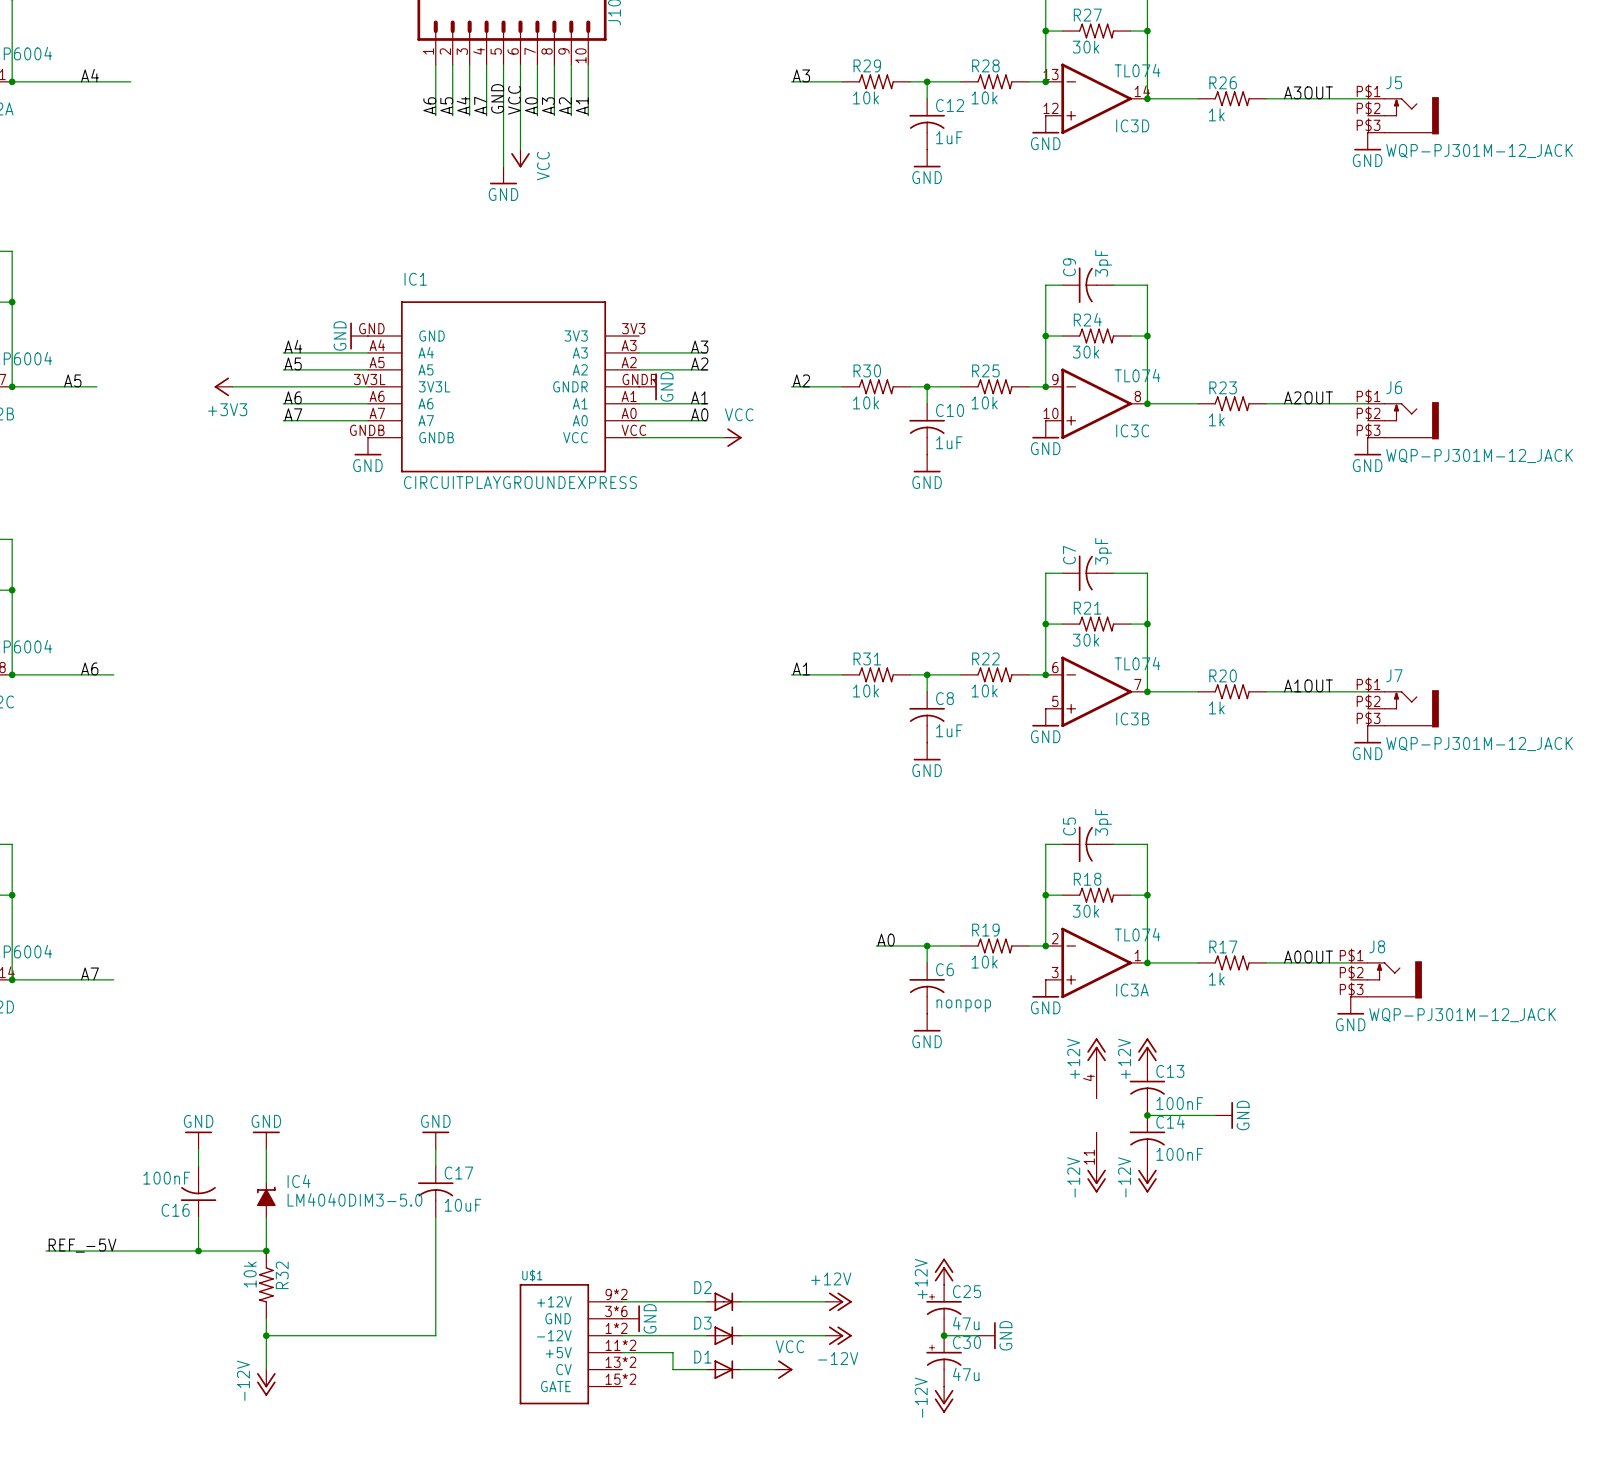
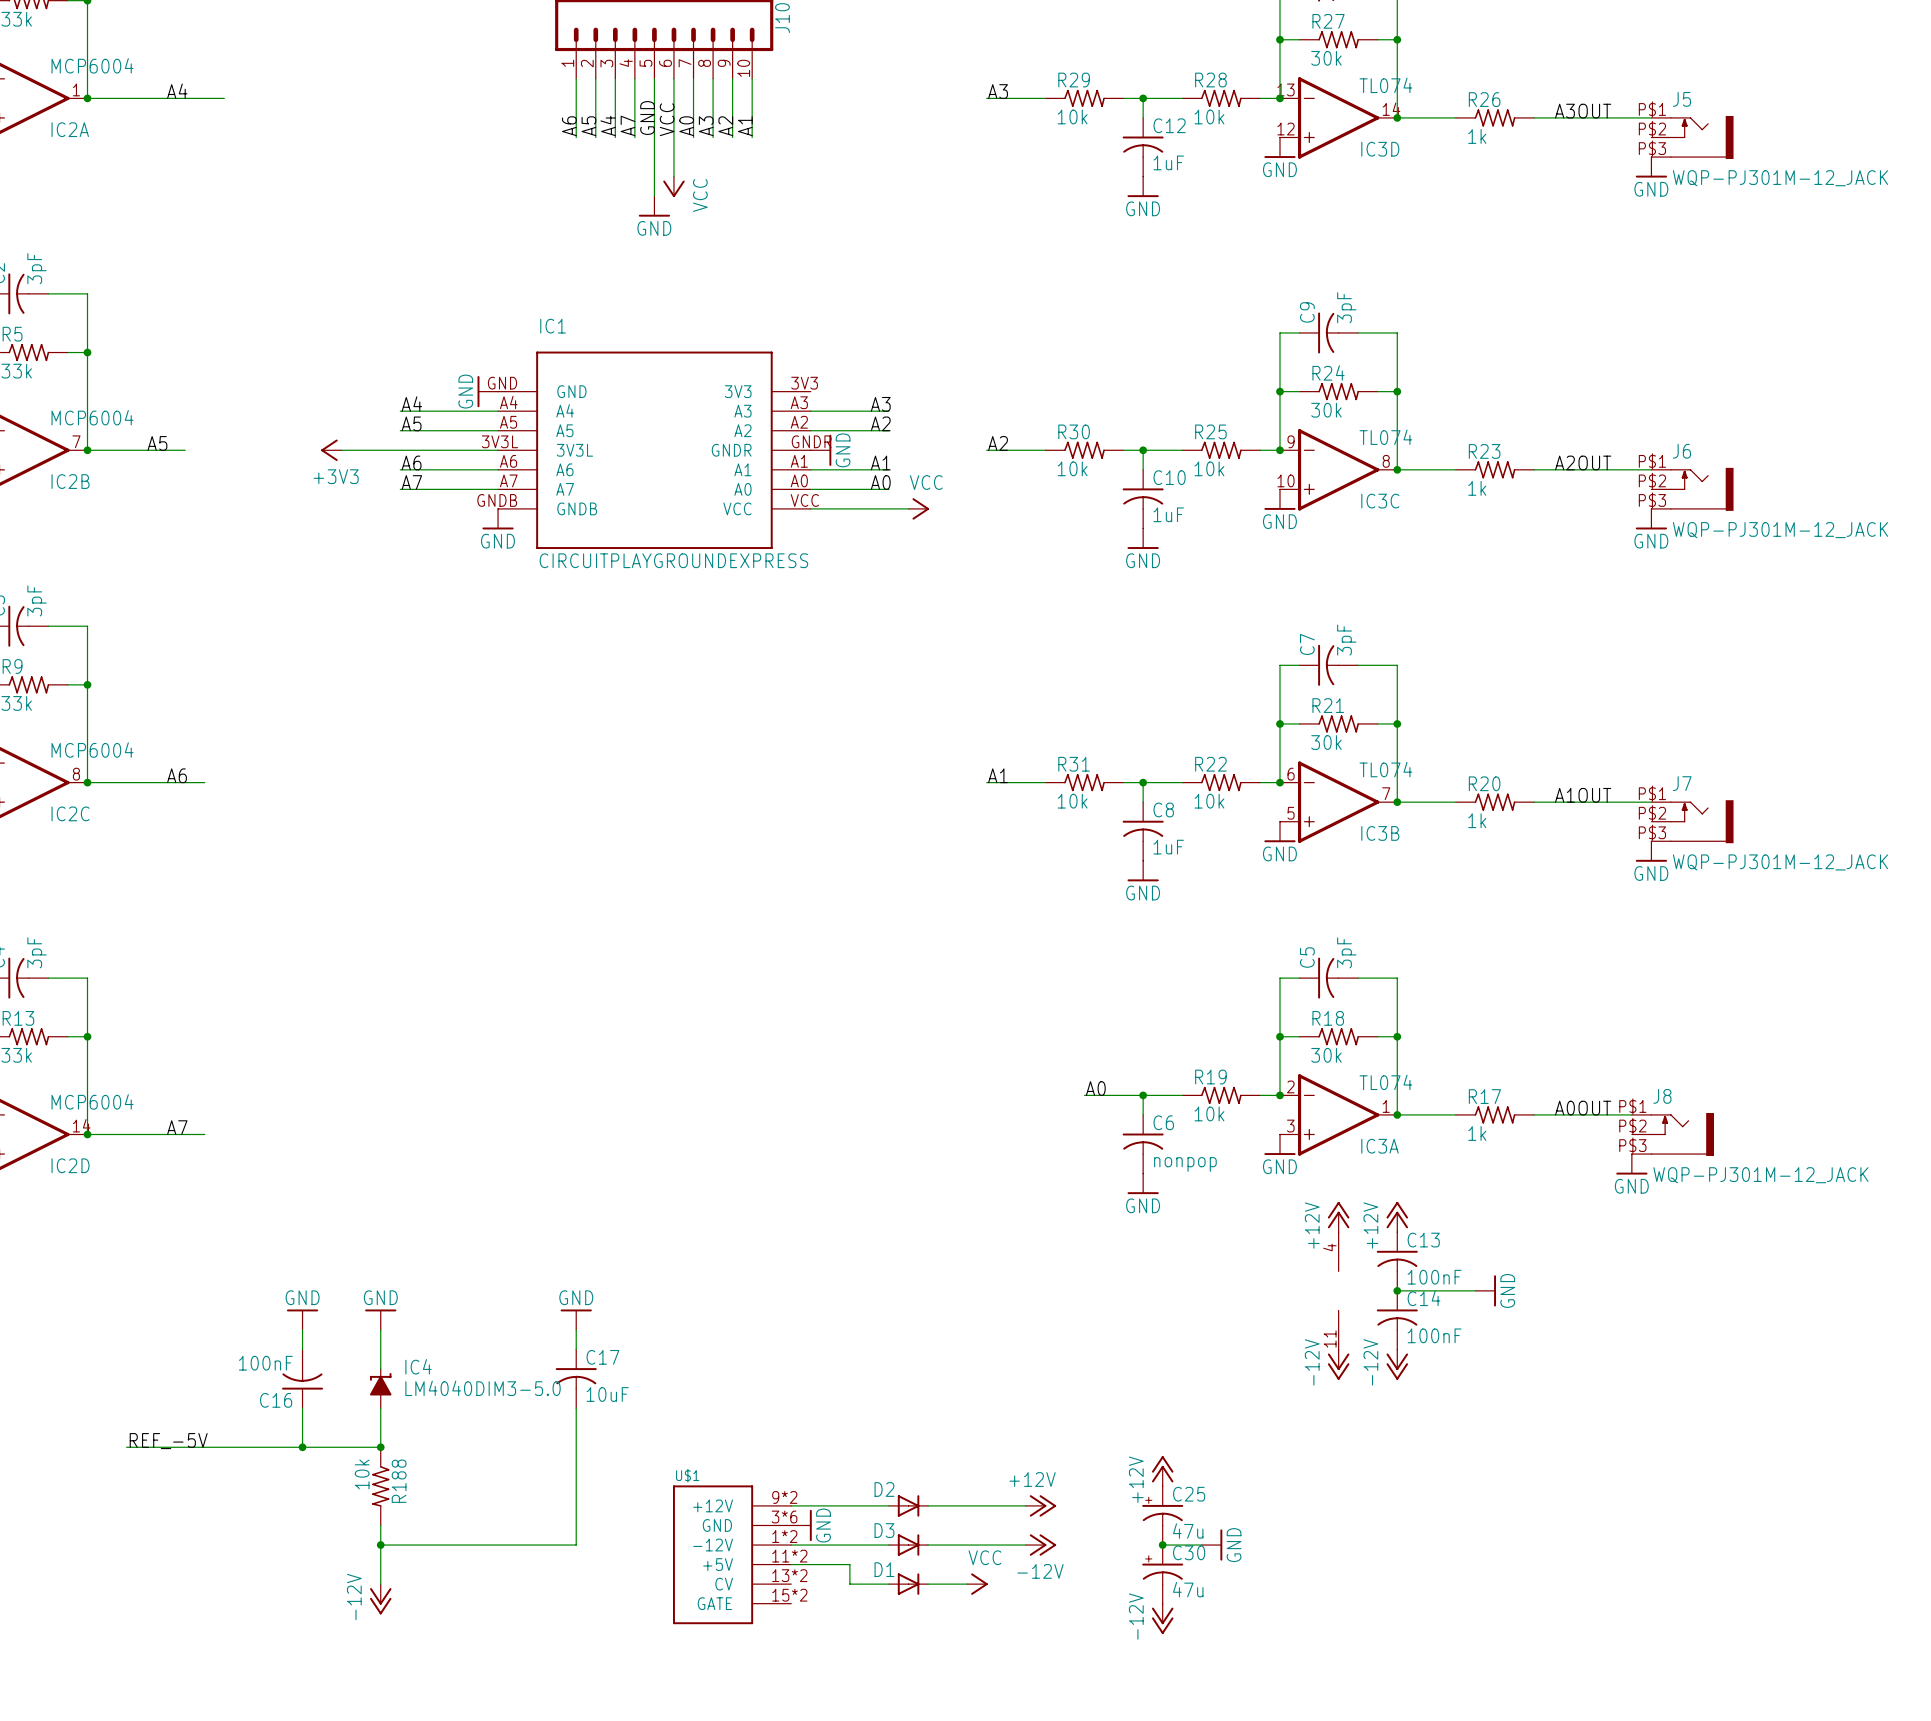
R32 name: R32 (282, 1275) -> R188 (399, 1481)

